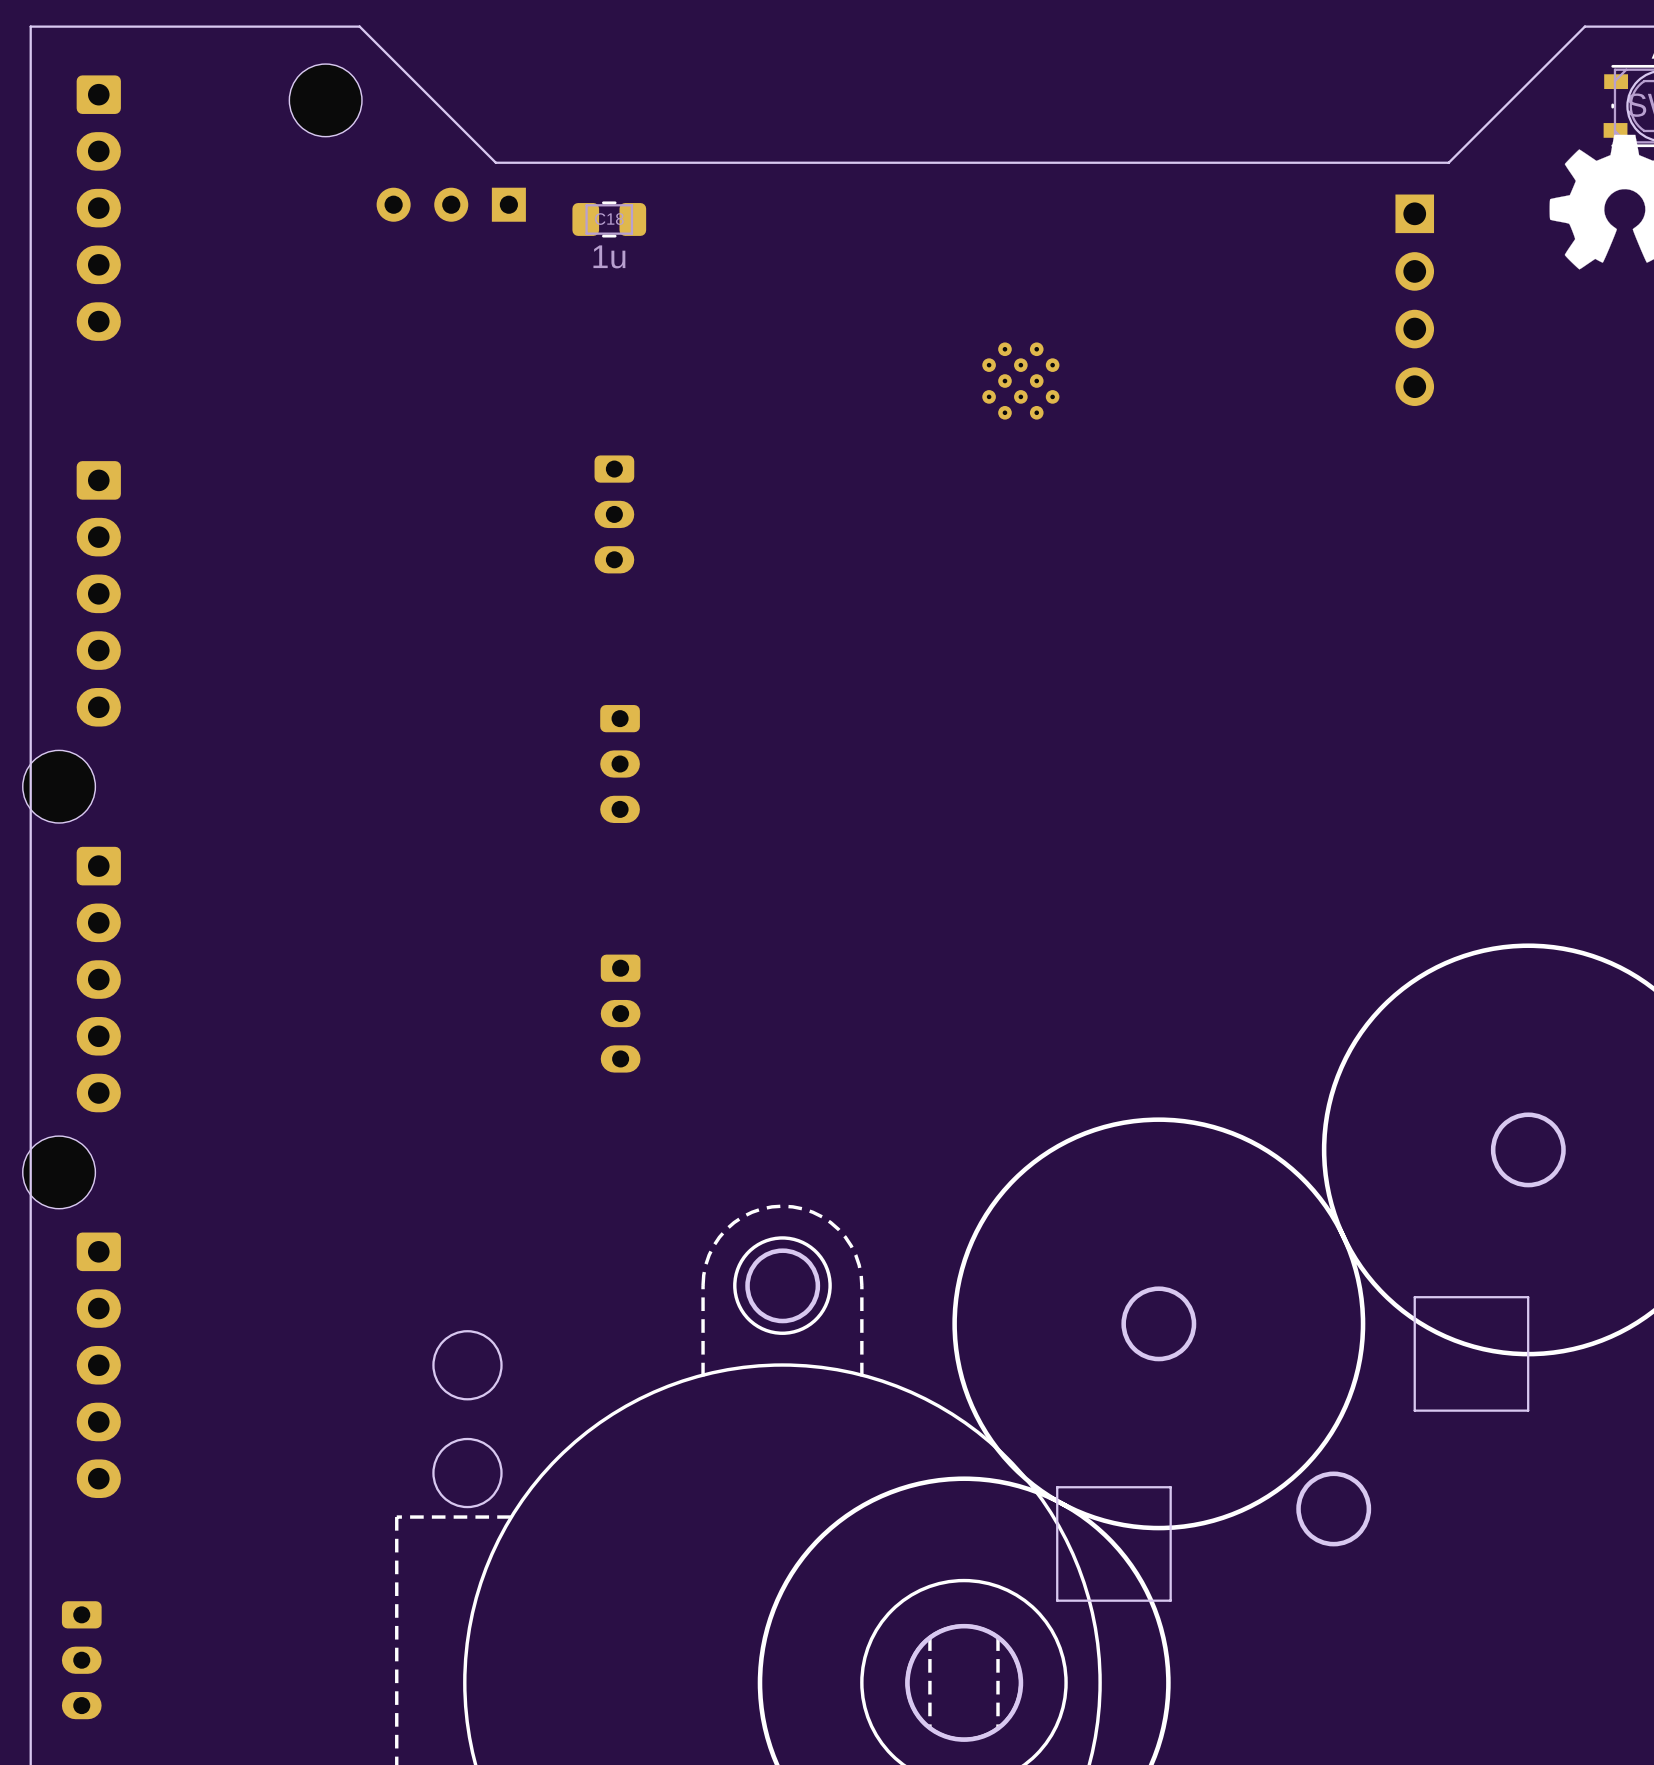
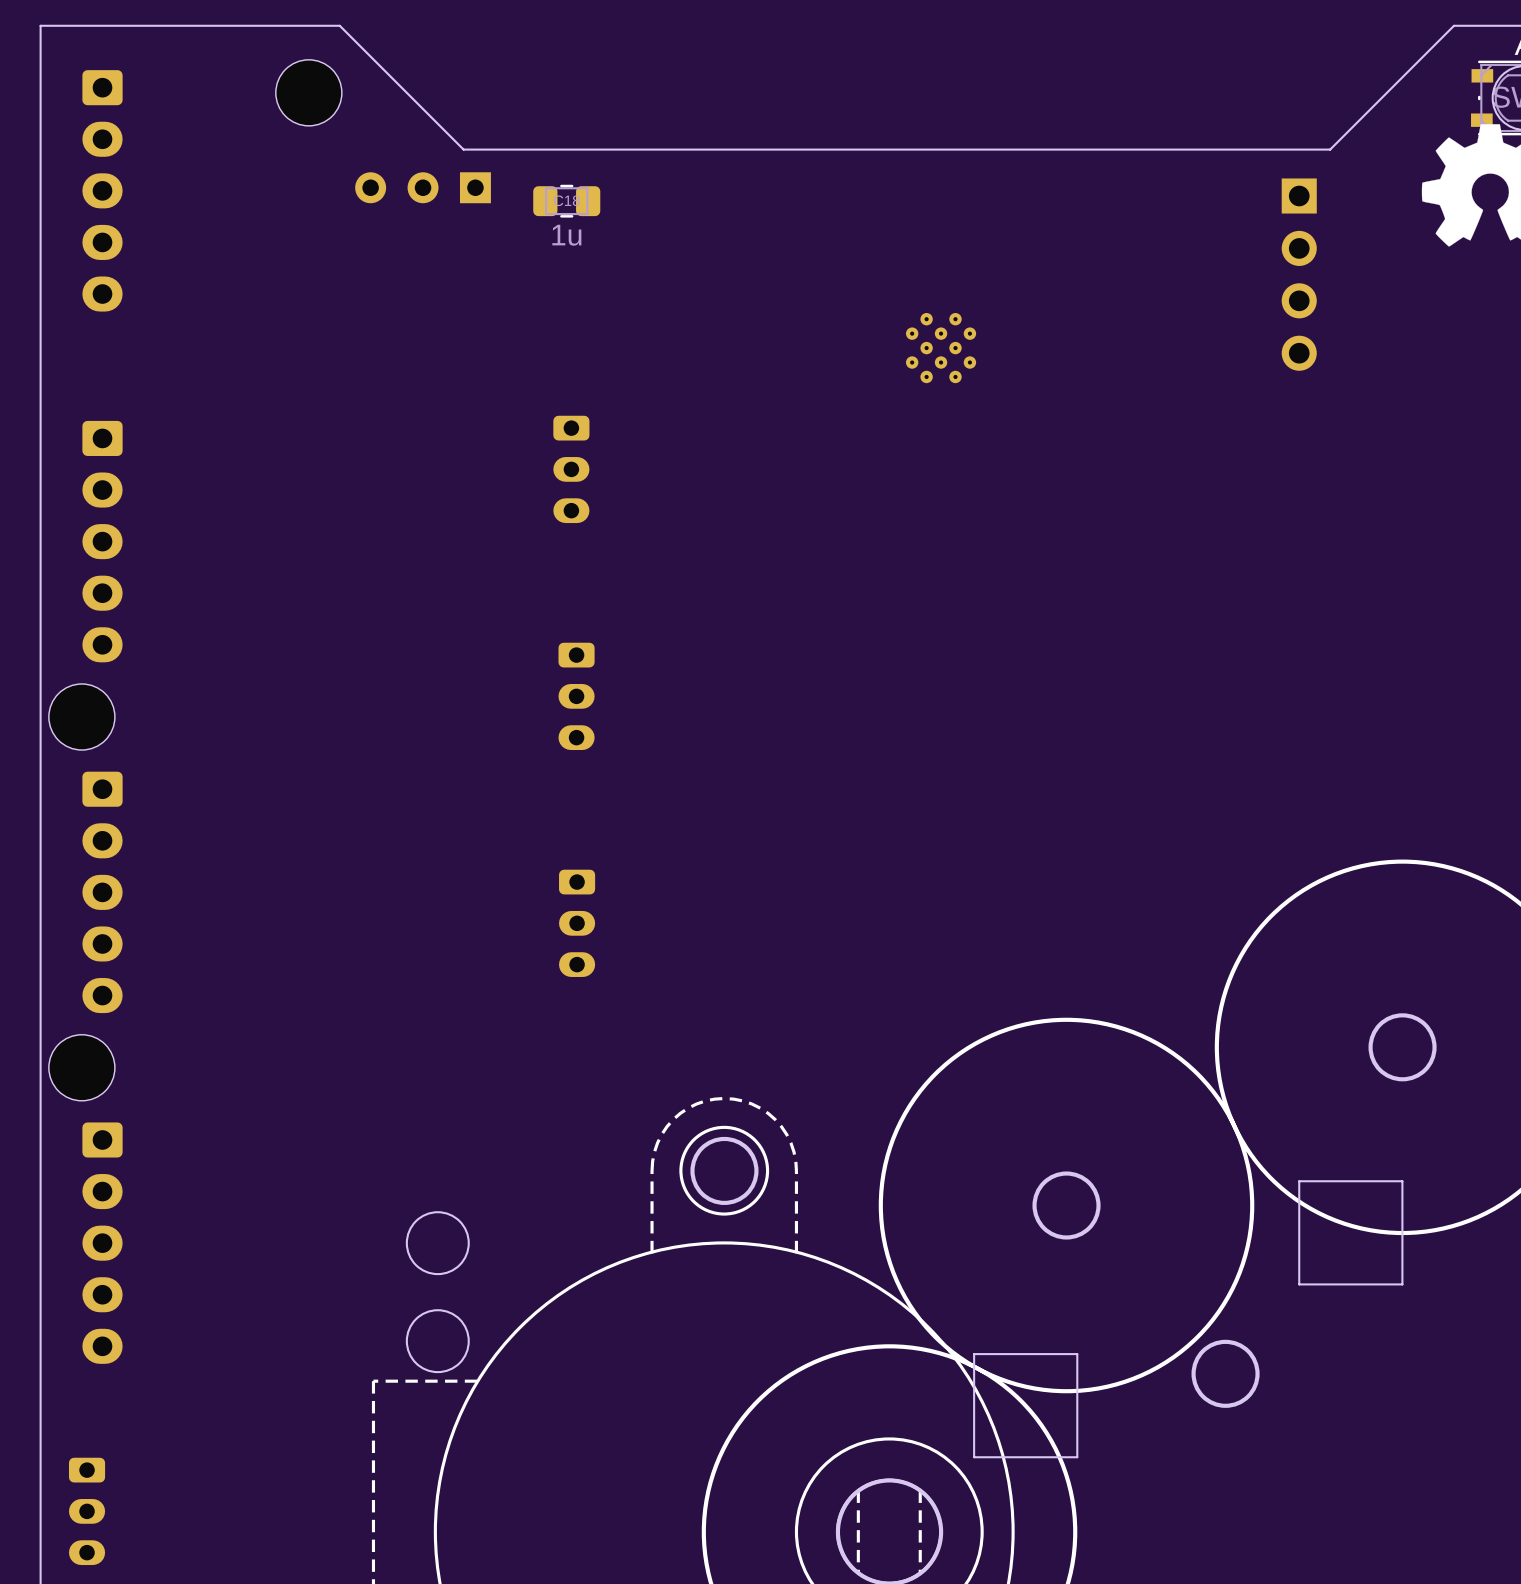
part position: (59, 786) -> (81, 717)
part position: (59, 1172) -> (81, 1067)

